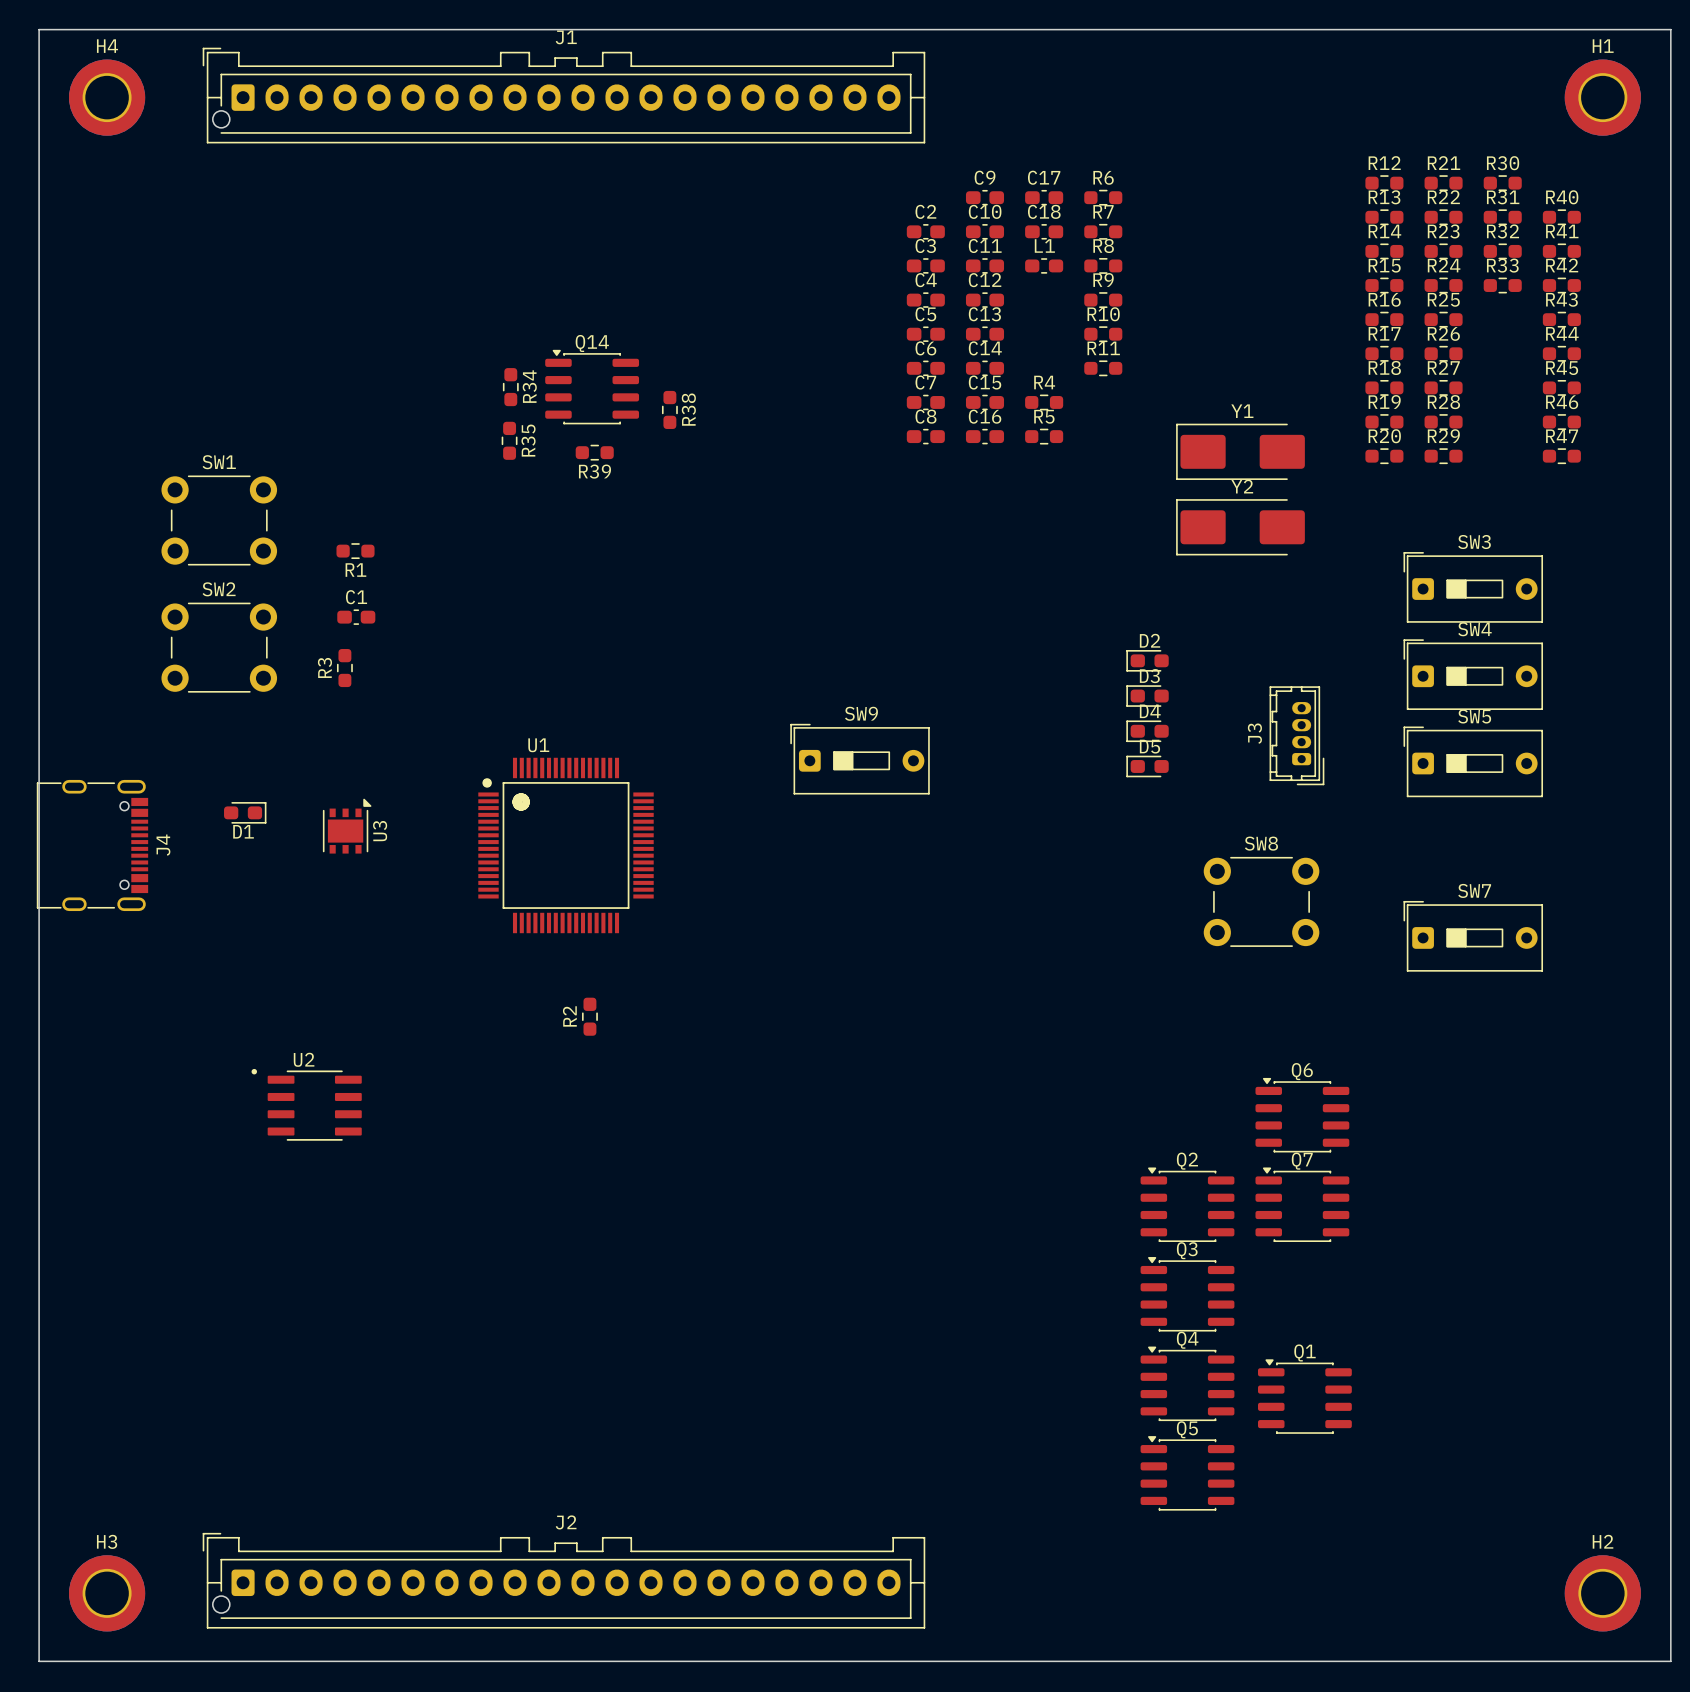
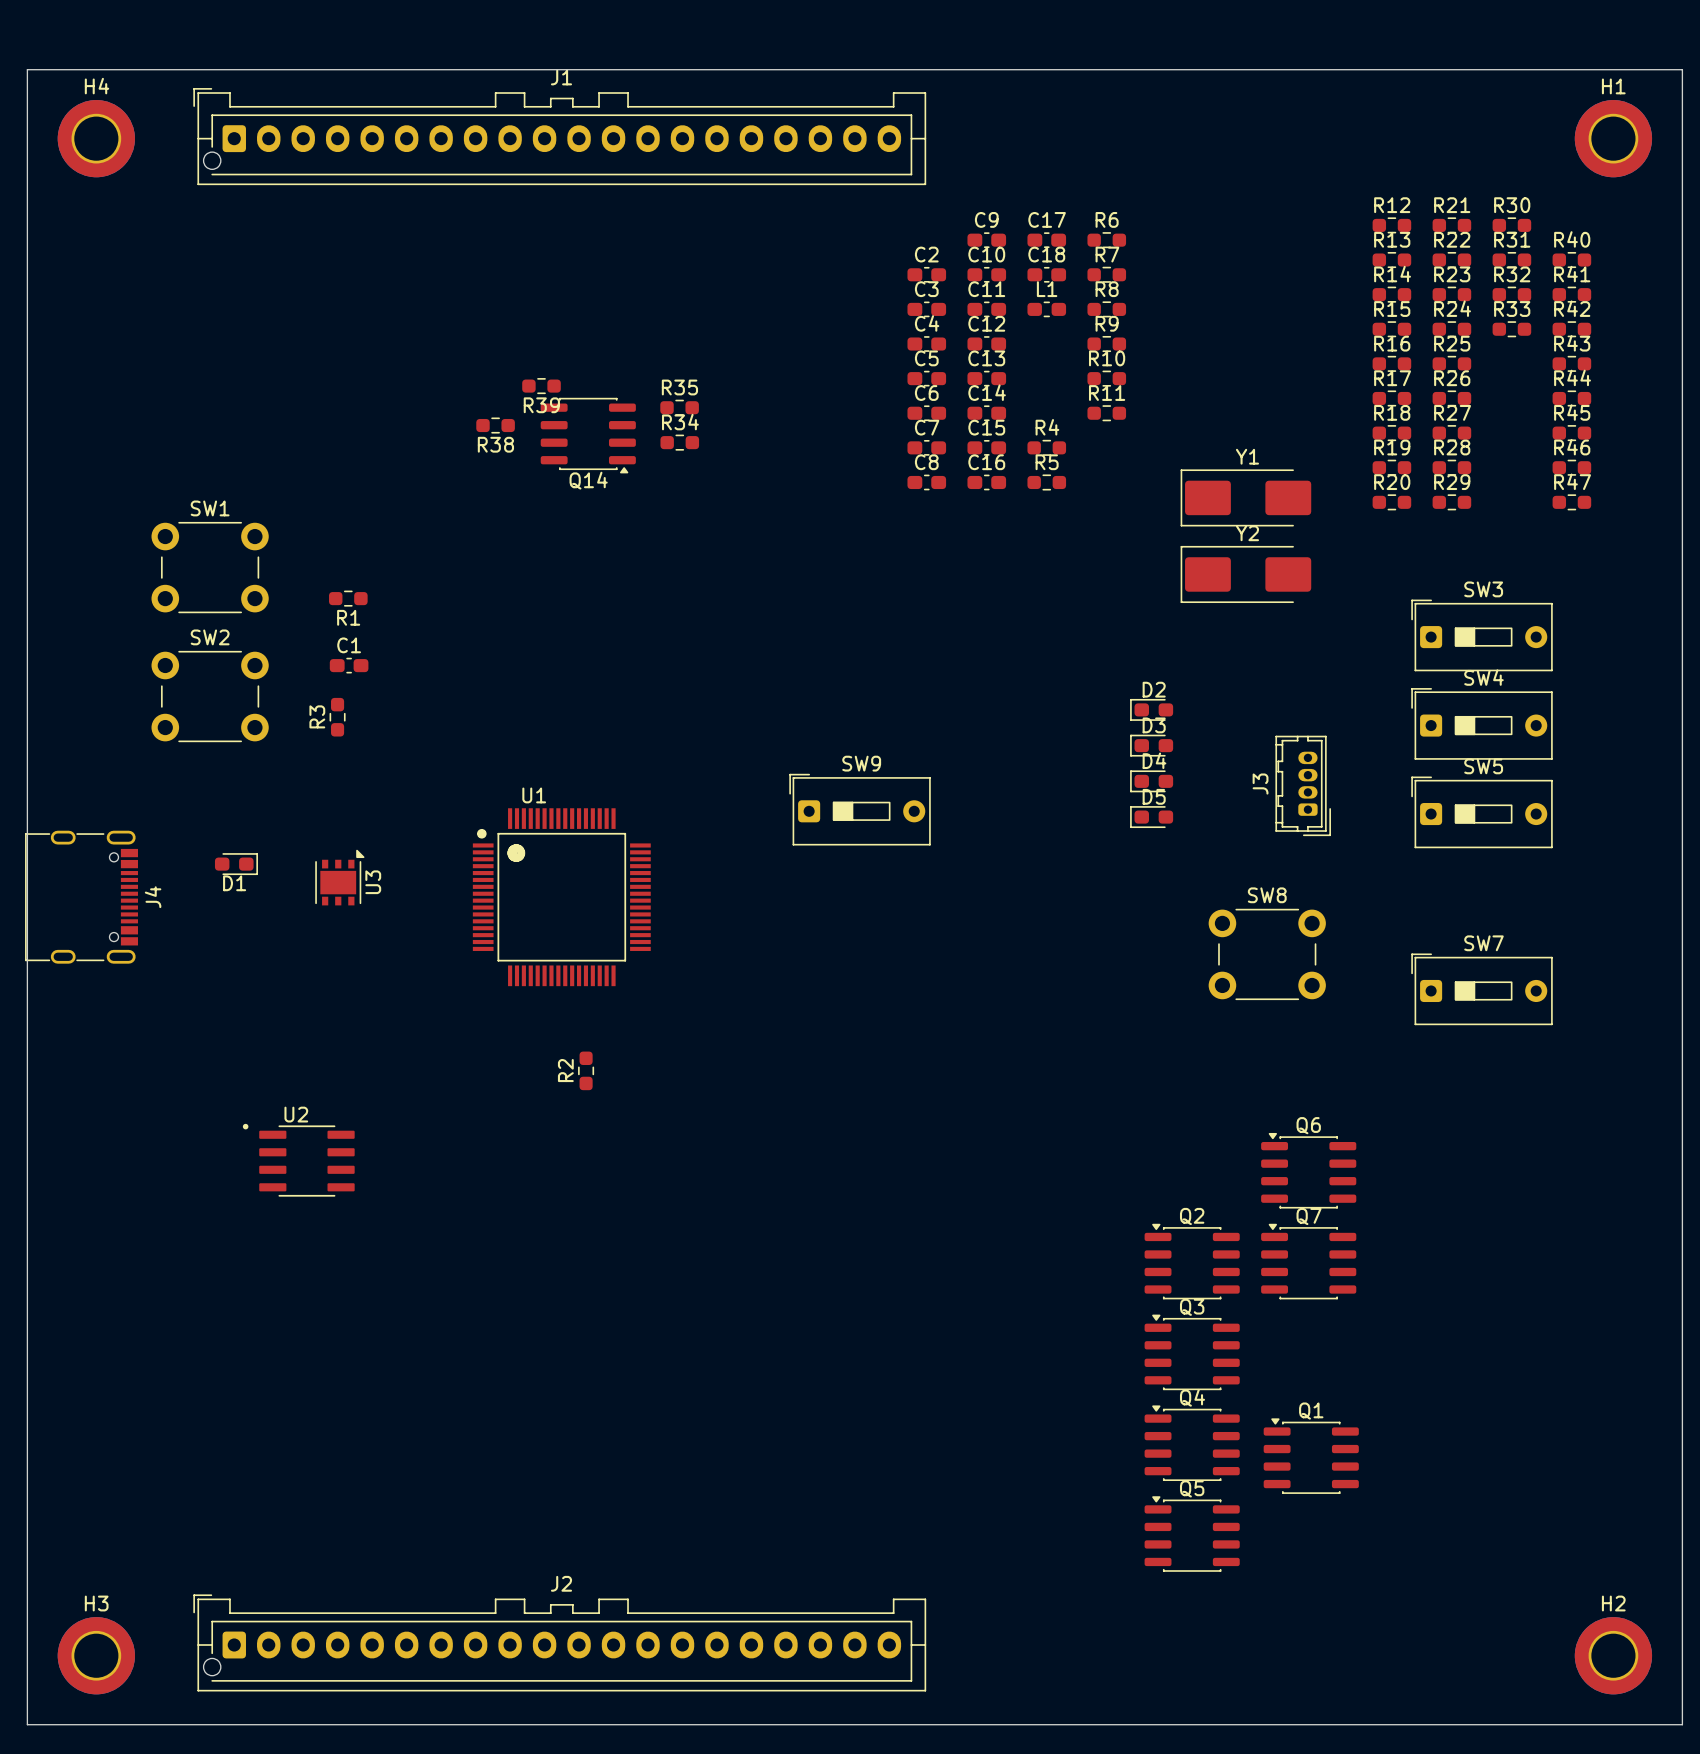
R34 name position: R34 (529, 386) -> R34 (680, 422)
R34 rotation: 0° (510, 387) -> 90° clockwise (679, 442)
R34 position: (510, 387) -> (679, 442)
Q14 rotation: 0° (592, 387) -> 180° (588, 435)
R38 rotation: 0° (669, 409) -> 90° clockwise (495, 425)
R38 position: (669, 409) -> (495, 425)
R35 rotation: 0° (509, 440) -> 90° clockwise (679, 407)
R35 position: (509, 440) -> (679, 407)
R35 name position: R35 (528, 440) -> R35 (679, 387)
R39 position: (594, 452) -> (541, 386)

